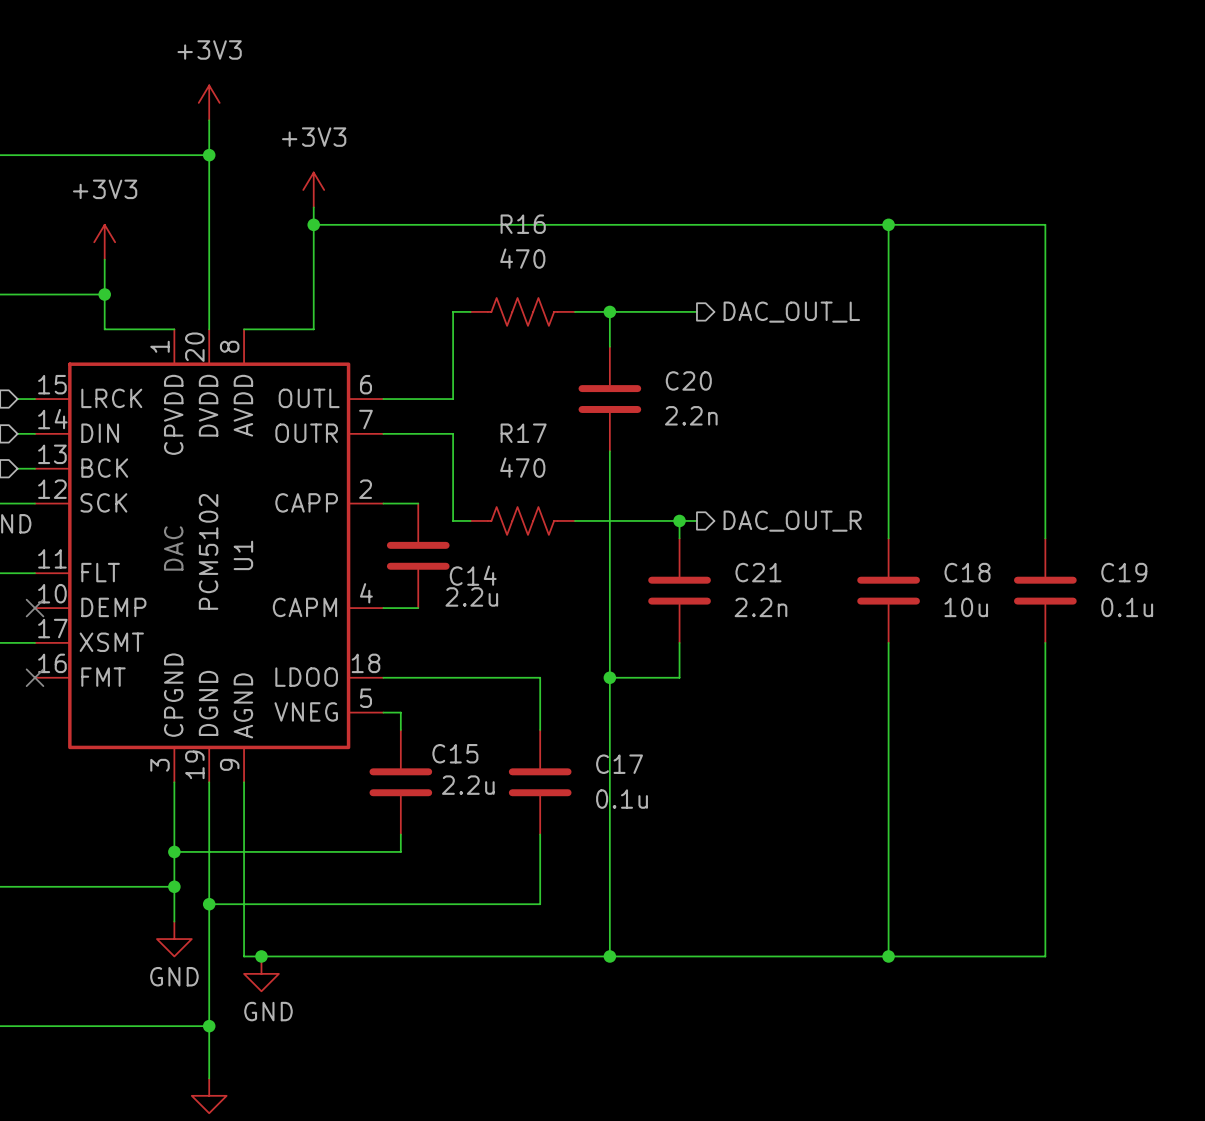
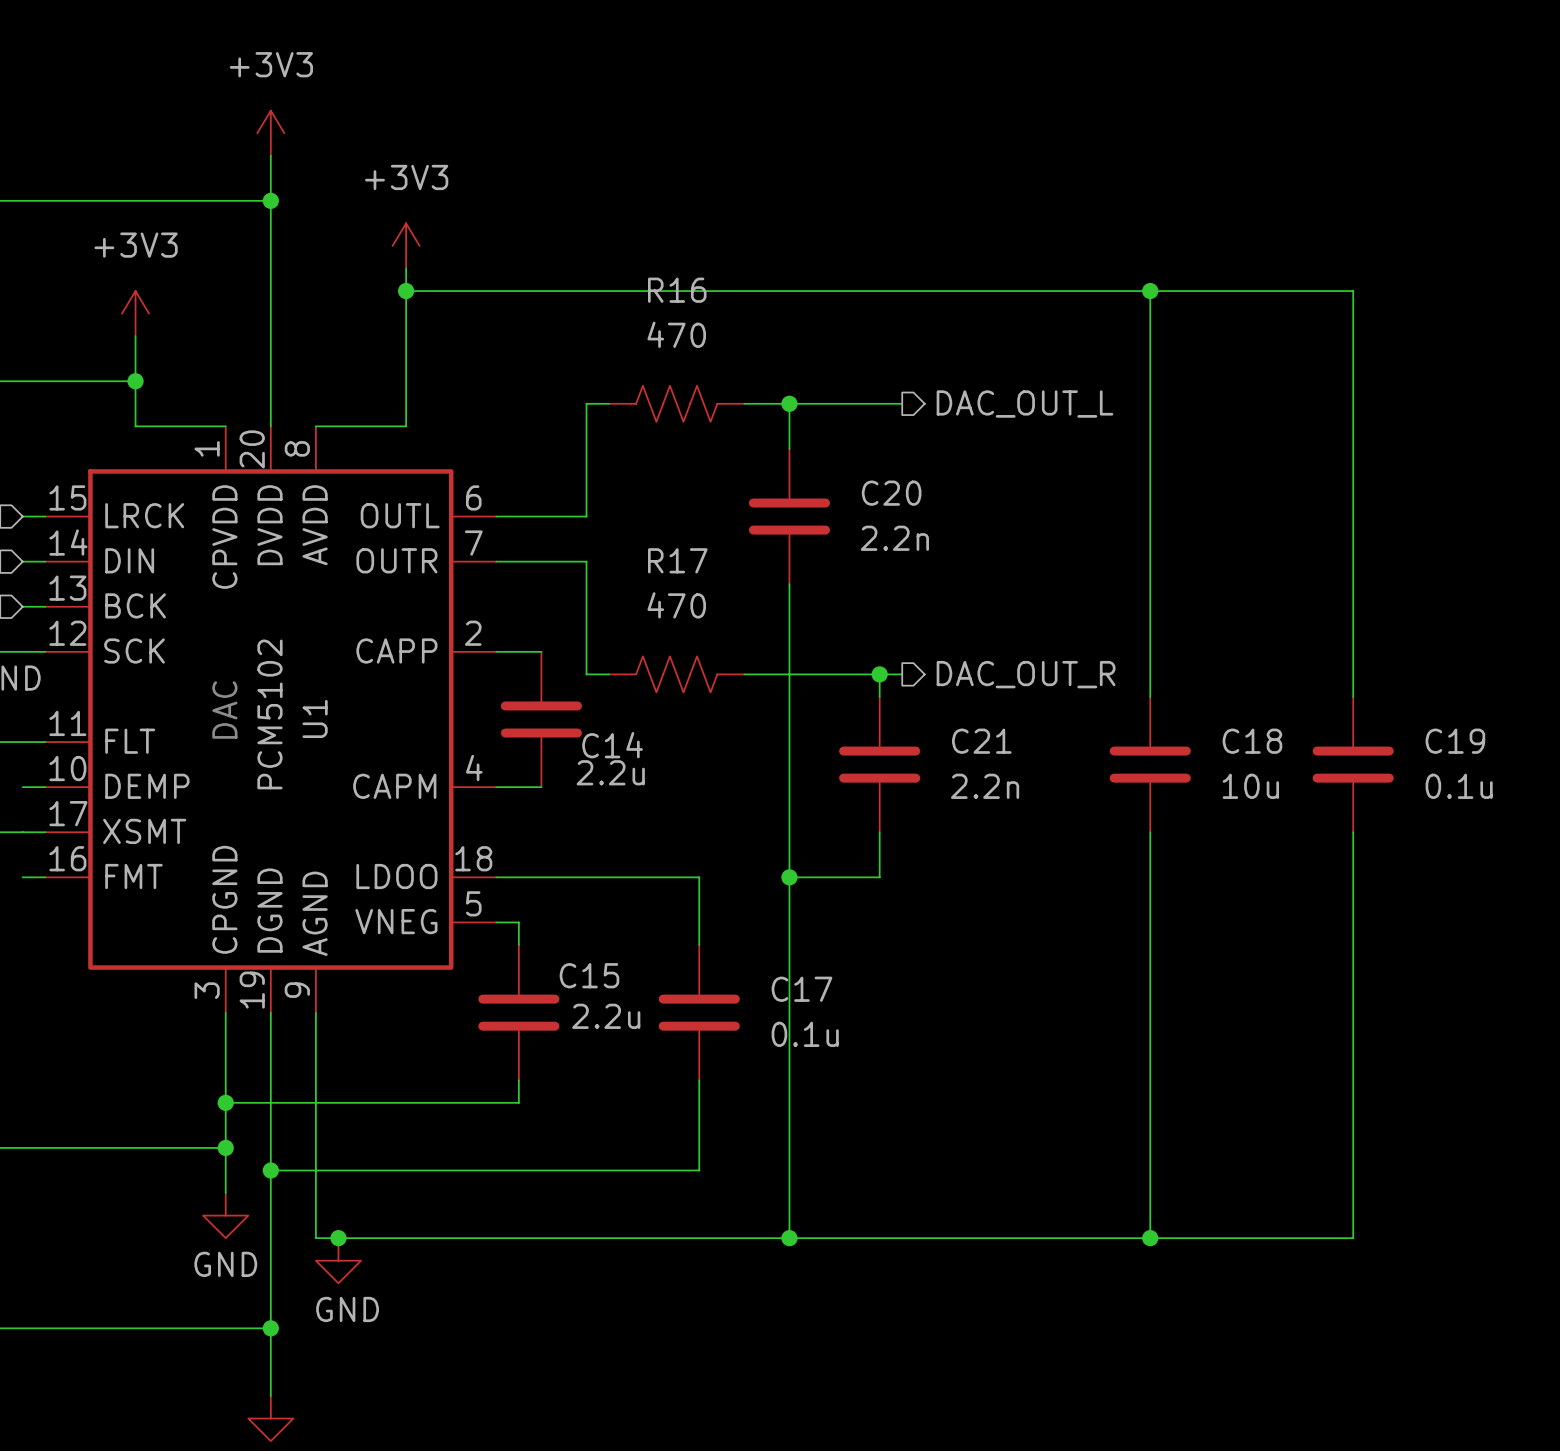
wire: none -> (22, 787) (45, 787)
no-connect mark: (35, 608) -> none
wire: none -> (22, 877) (45, 877)
no-connect mark: (35, 677) -> none

